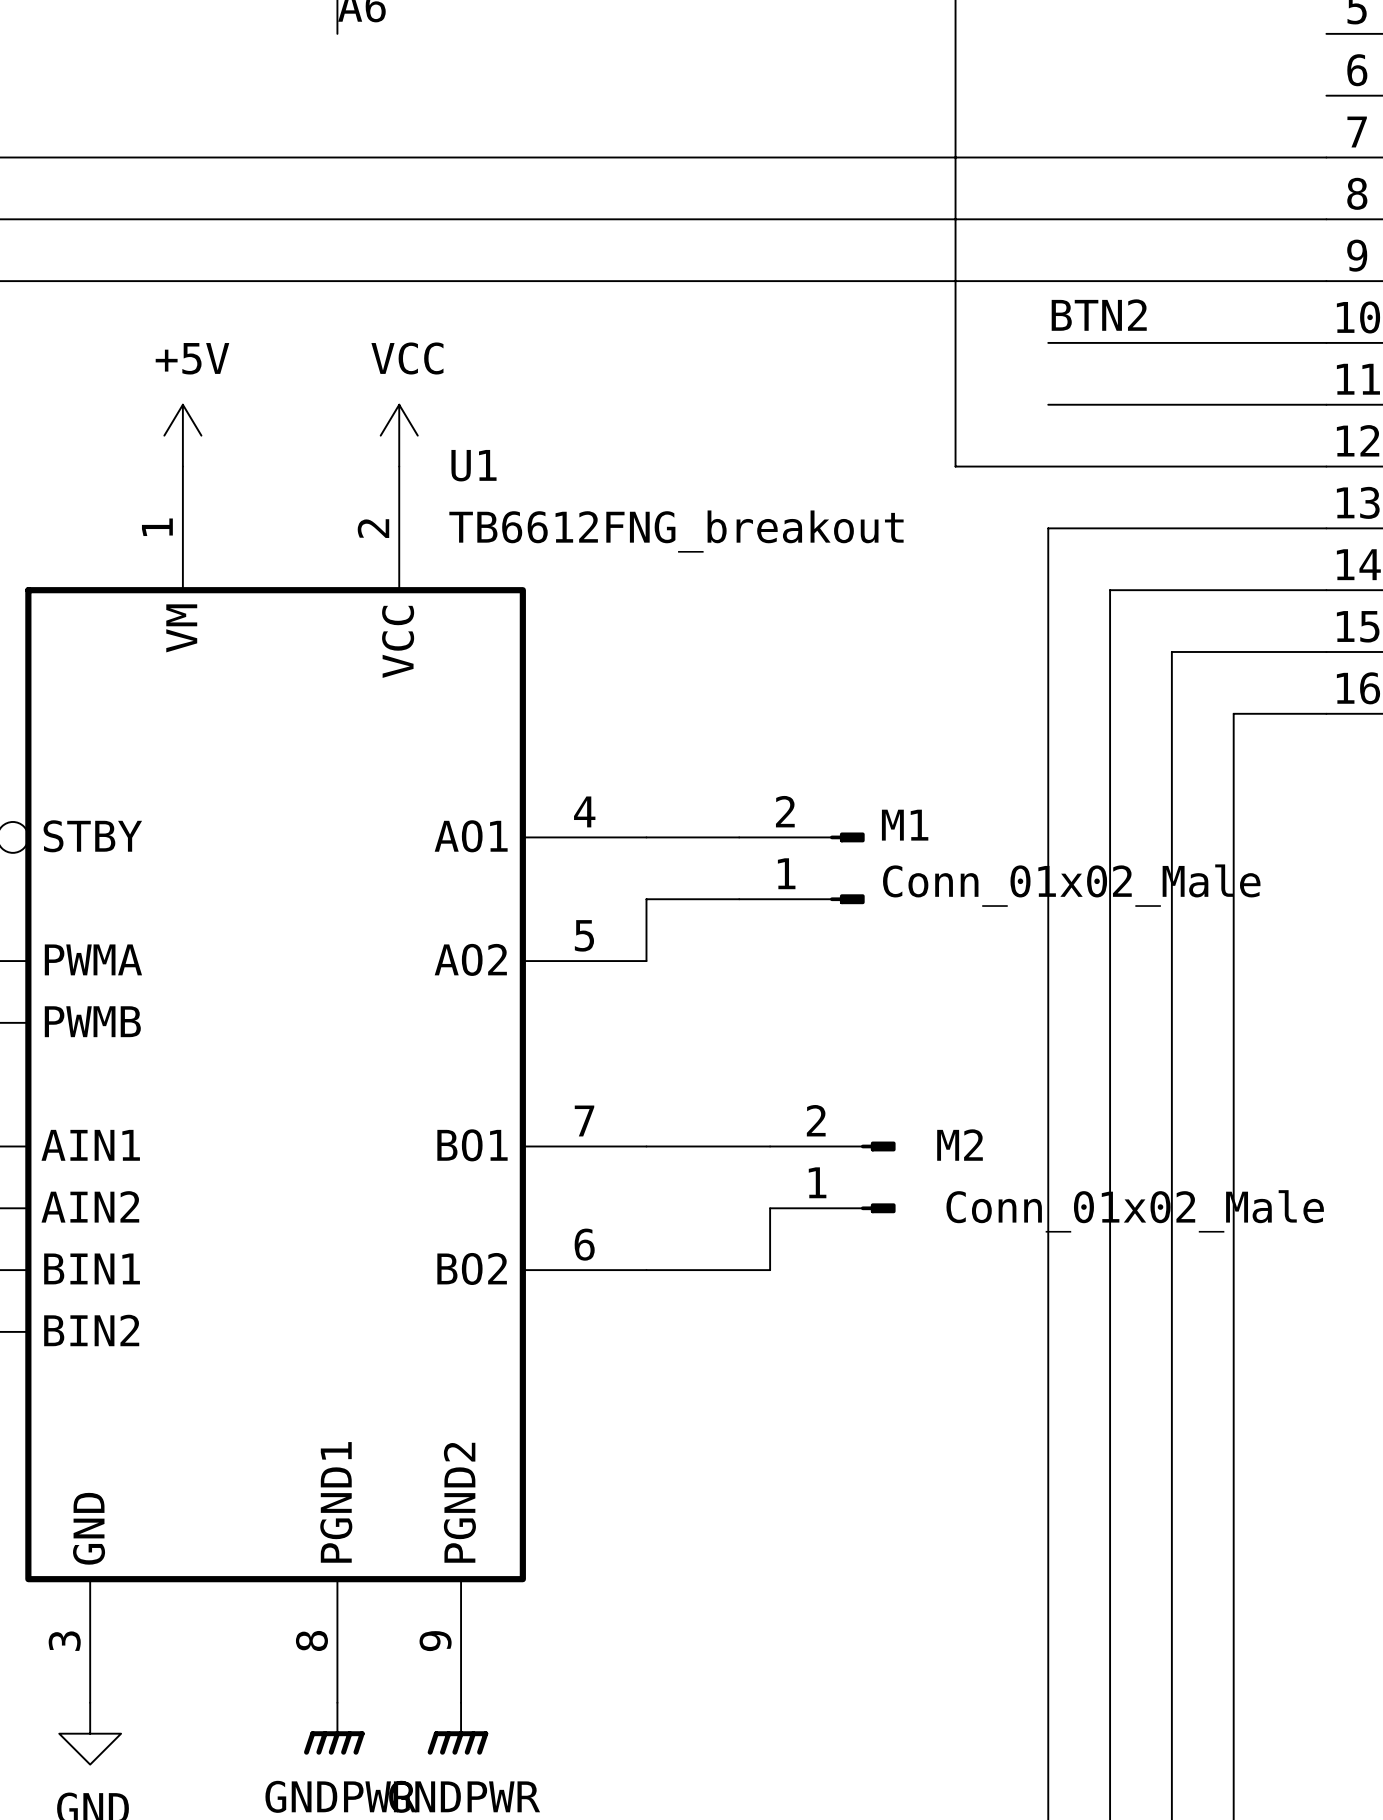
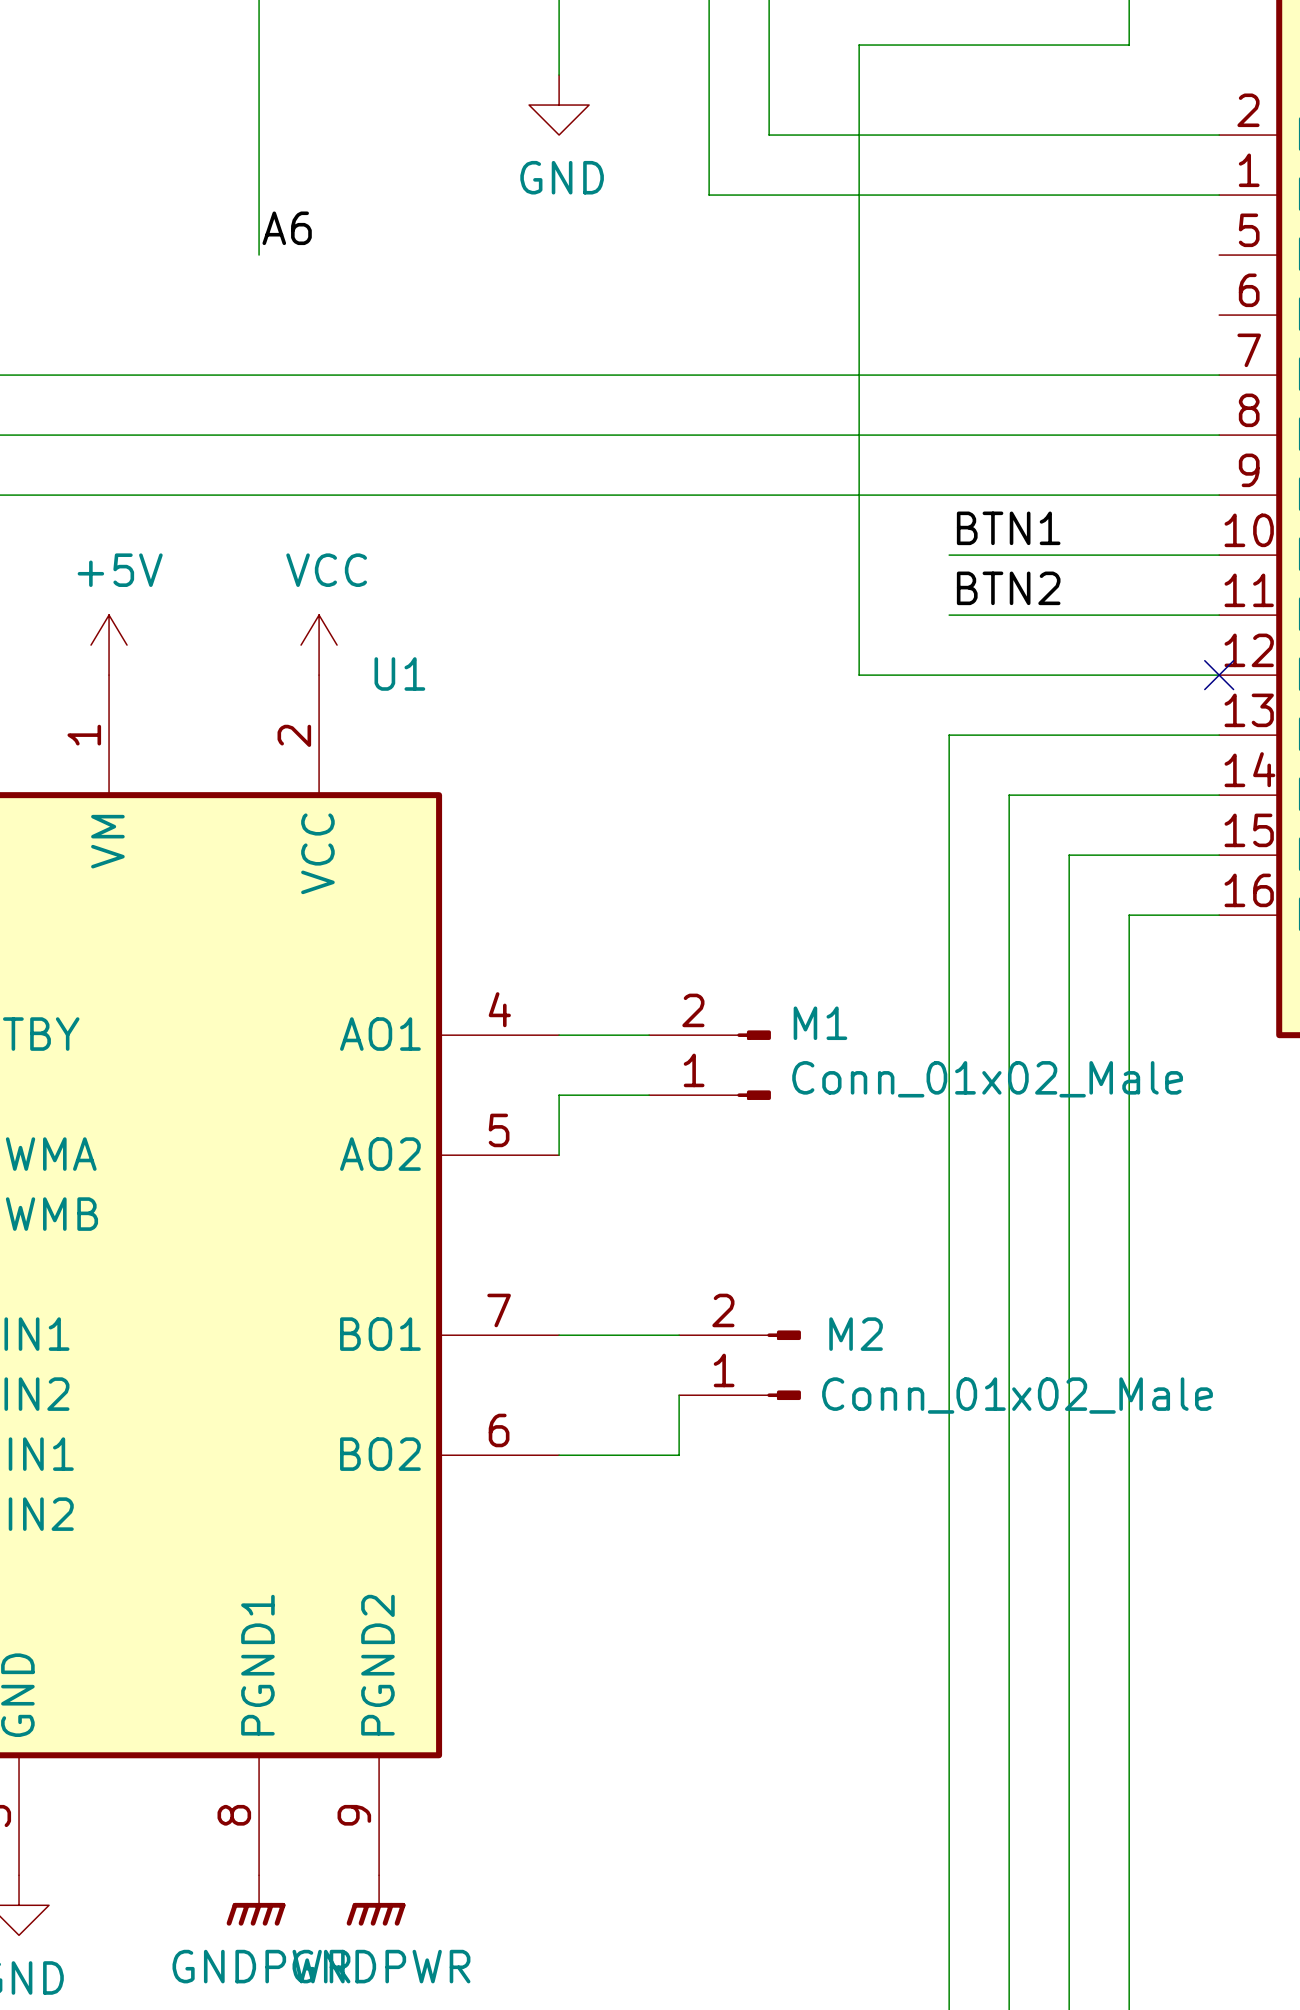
label: BTN2 (1099, 315) -> BTN1 (1008, 528)
label: none -> BTN2 (1008, 588)
no-connect mark: none -> (1219, 675)
U1 value: TB6612FNG_breakout (676, 531) -> none

